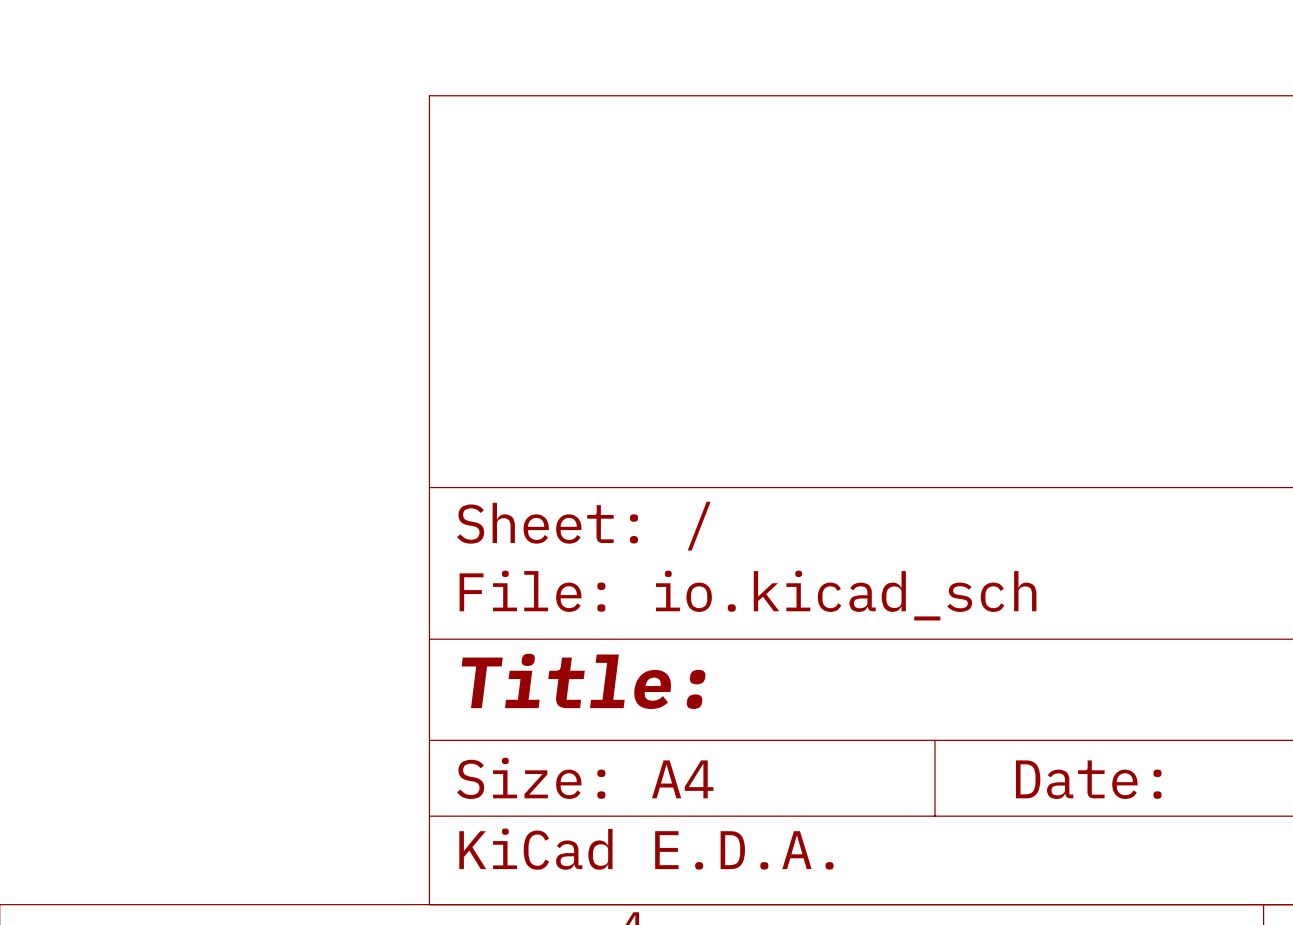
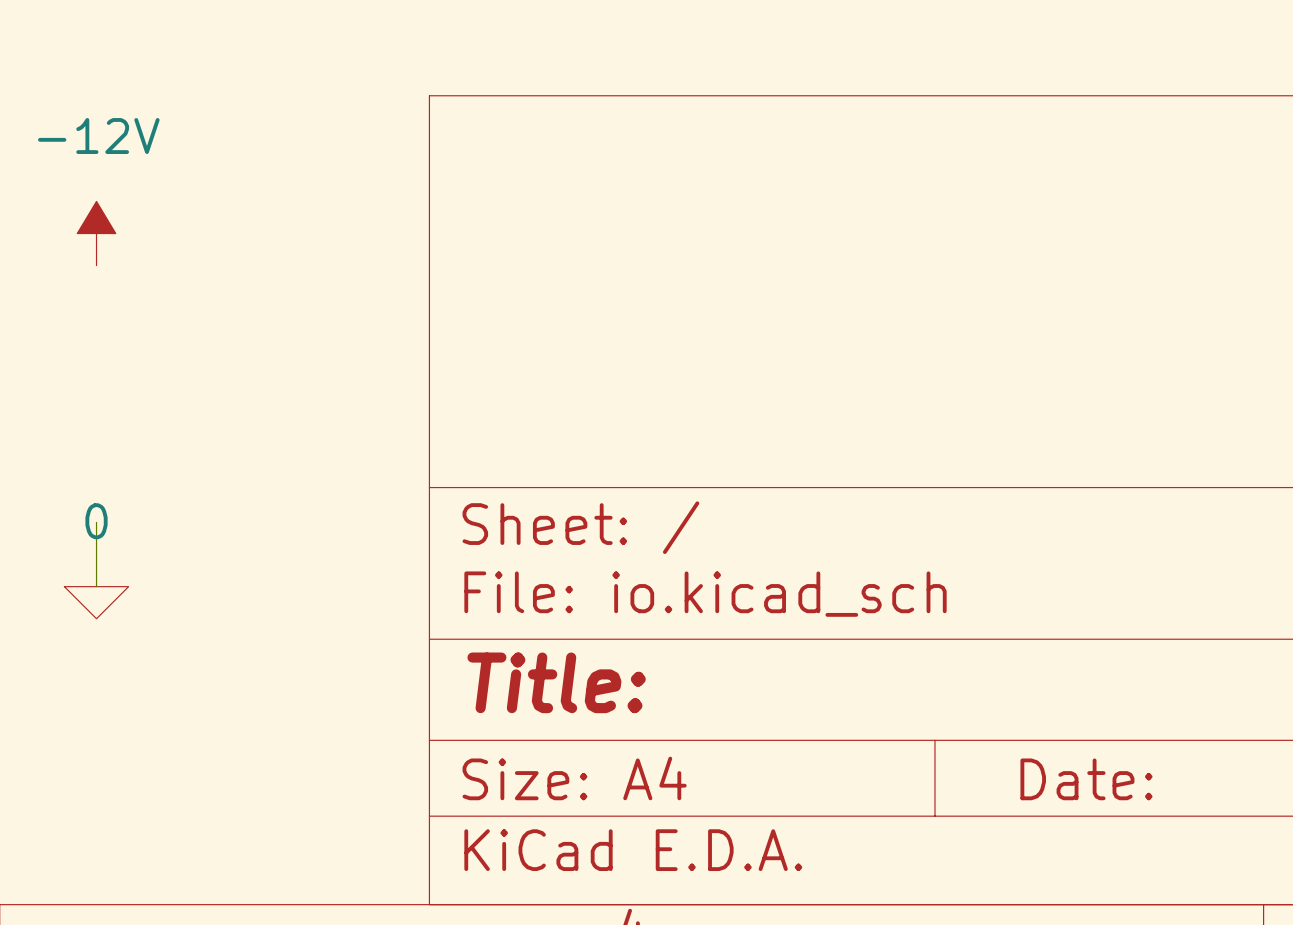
power symbol: none -> -12V (96, 233)
wire: none -> (96, 522) (96, 586)
power symbol: none -> 0 (96, 602)

